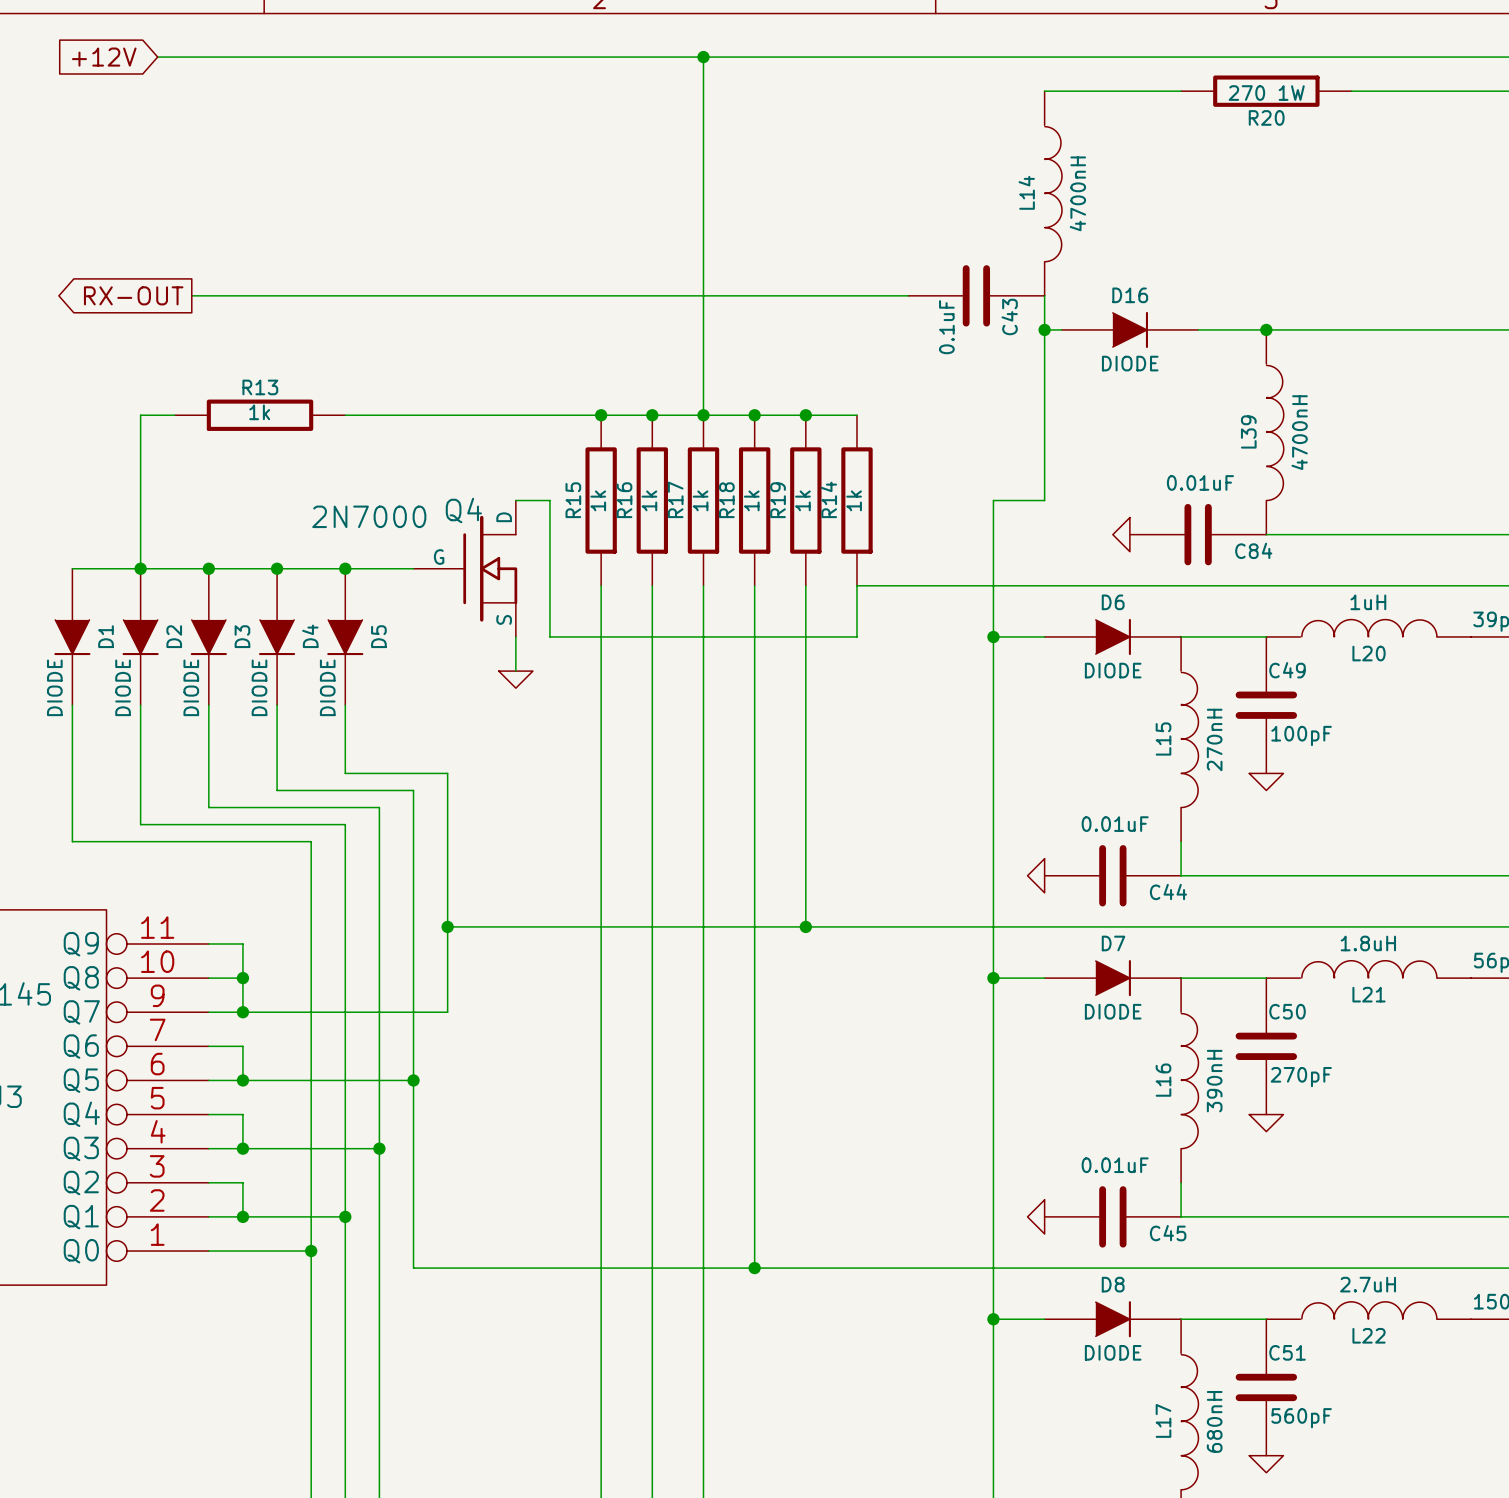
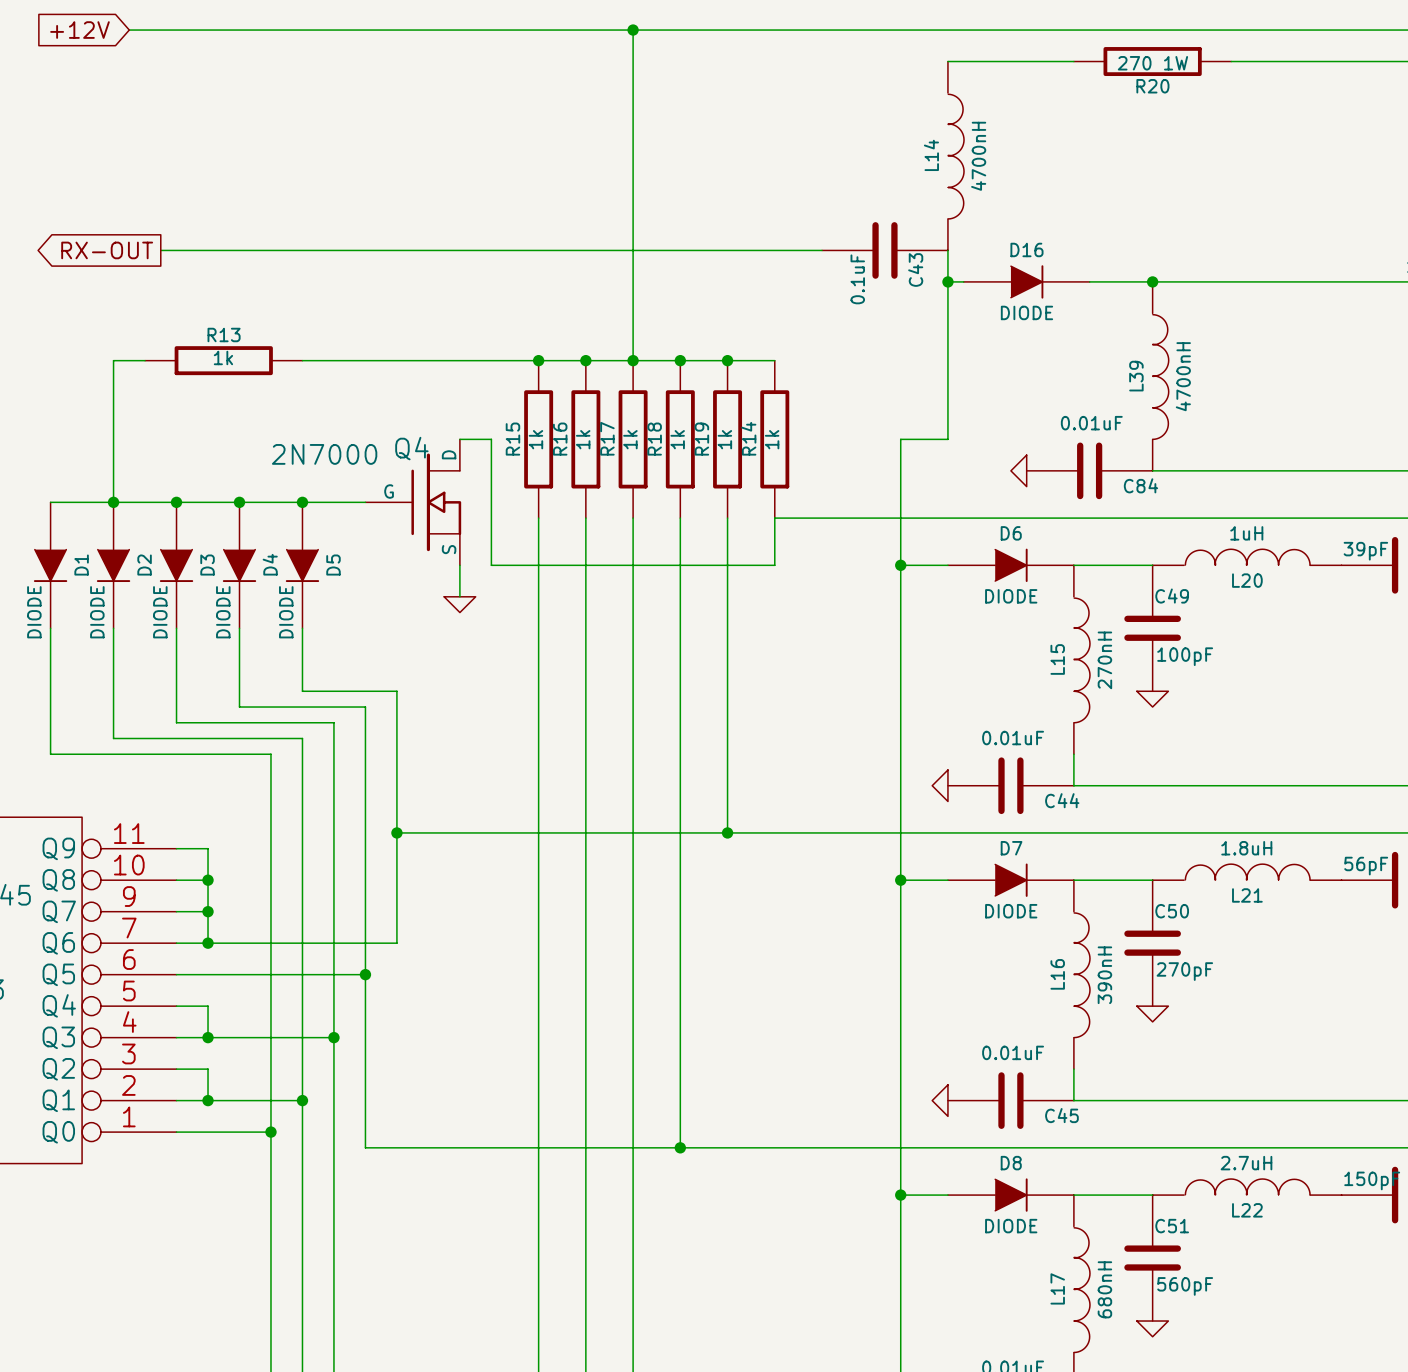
wire: (242, 1012) (447, 1012) -> (208, 911) (208, 943) (396, 943) (396, 911)
wire: (242, 1046) (242, 1080) -> none
junction position: (242, 1080) -> (208, 943)

